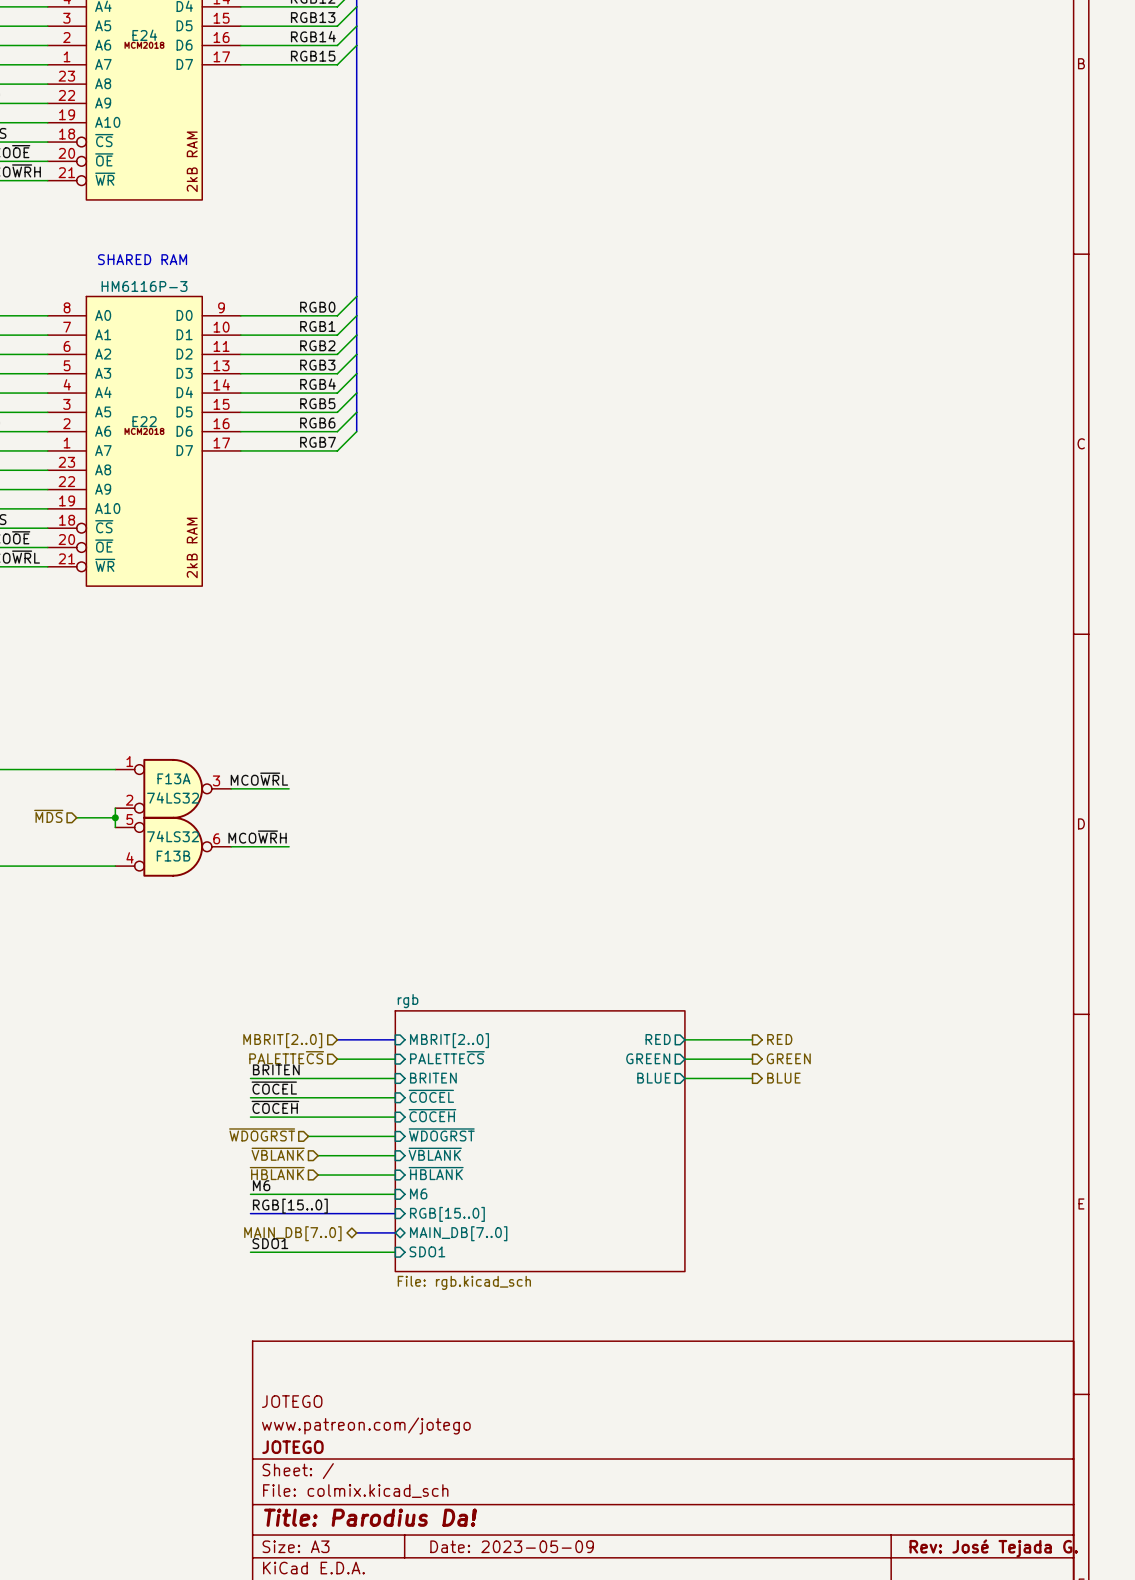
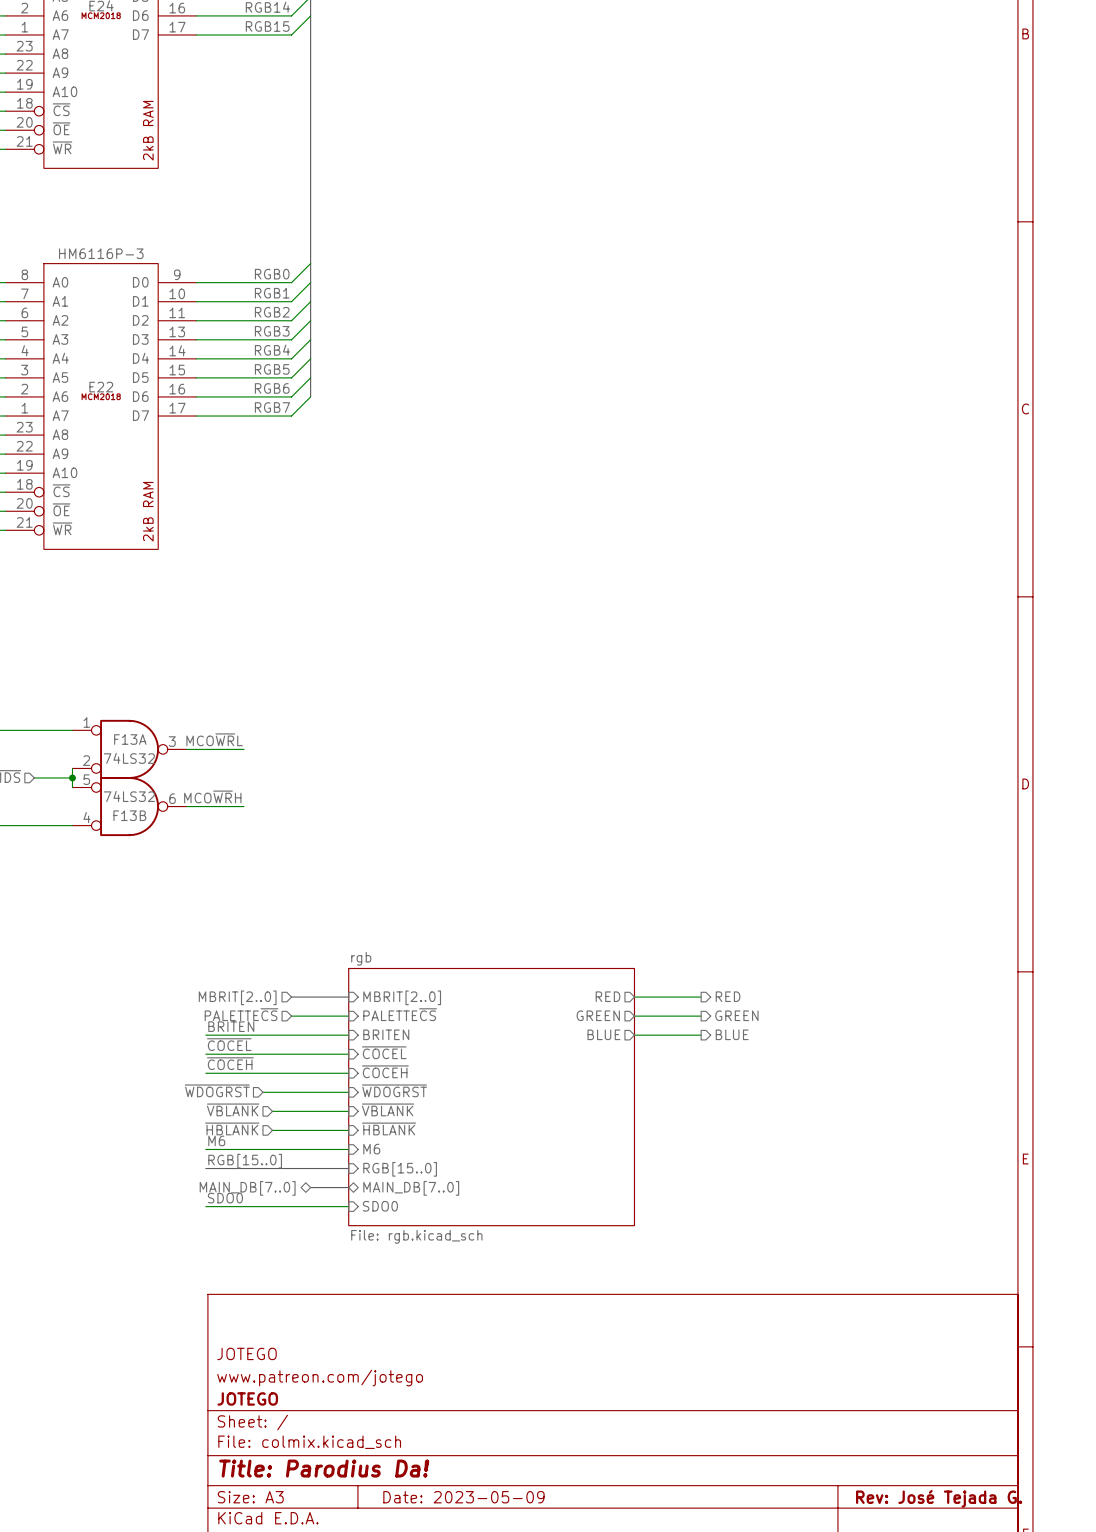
text: SHARED RAM (142, 259) -> none
label: SDO1 (270, 1243) -> SDO0 (225, 1198)
sheet pin: SDO1 (427, 1251) -> SDO0 (380, 1206)

